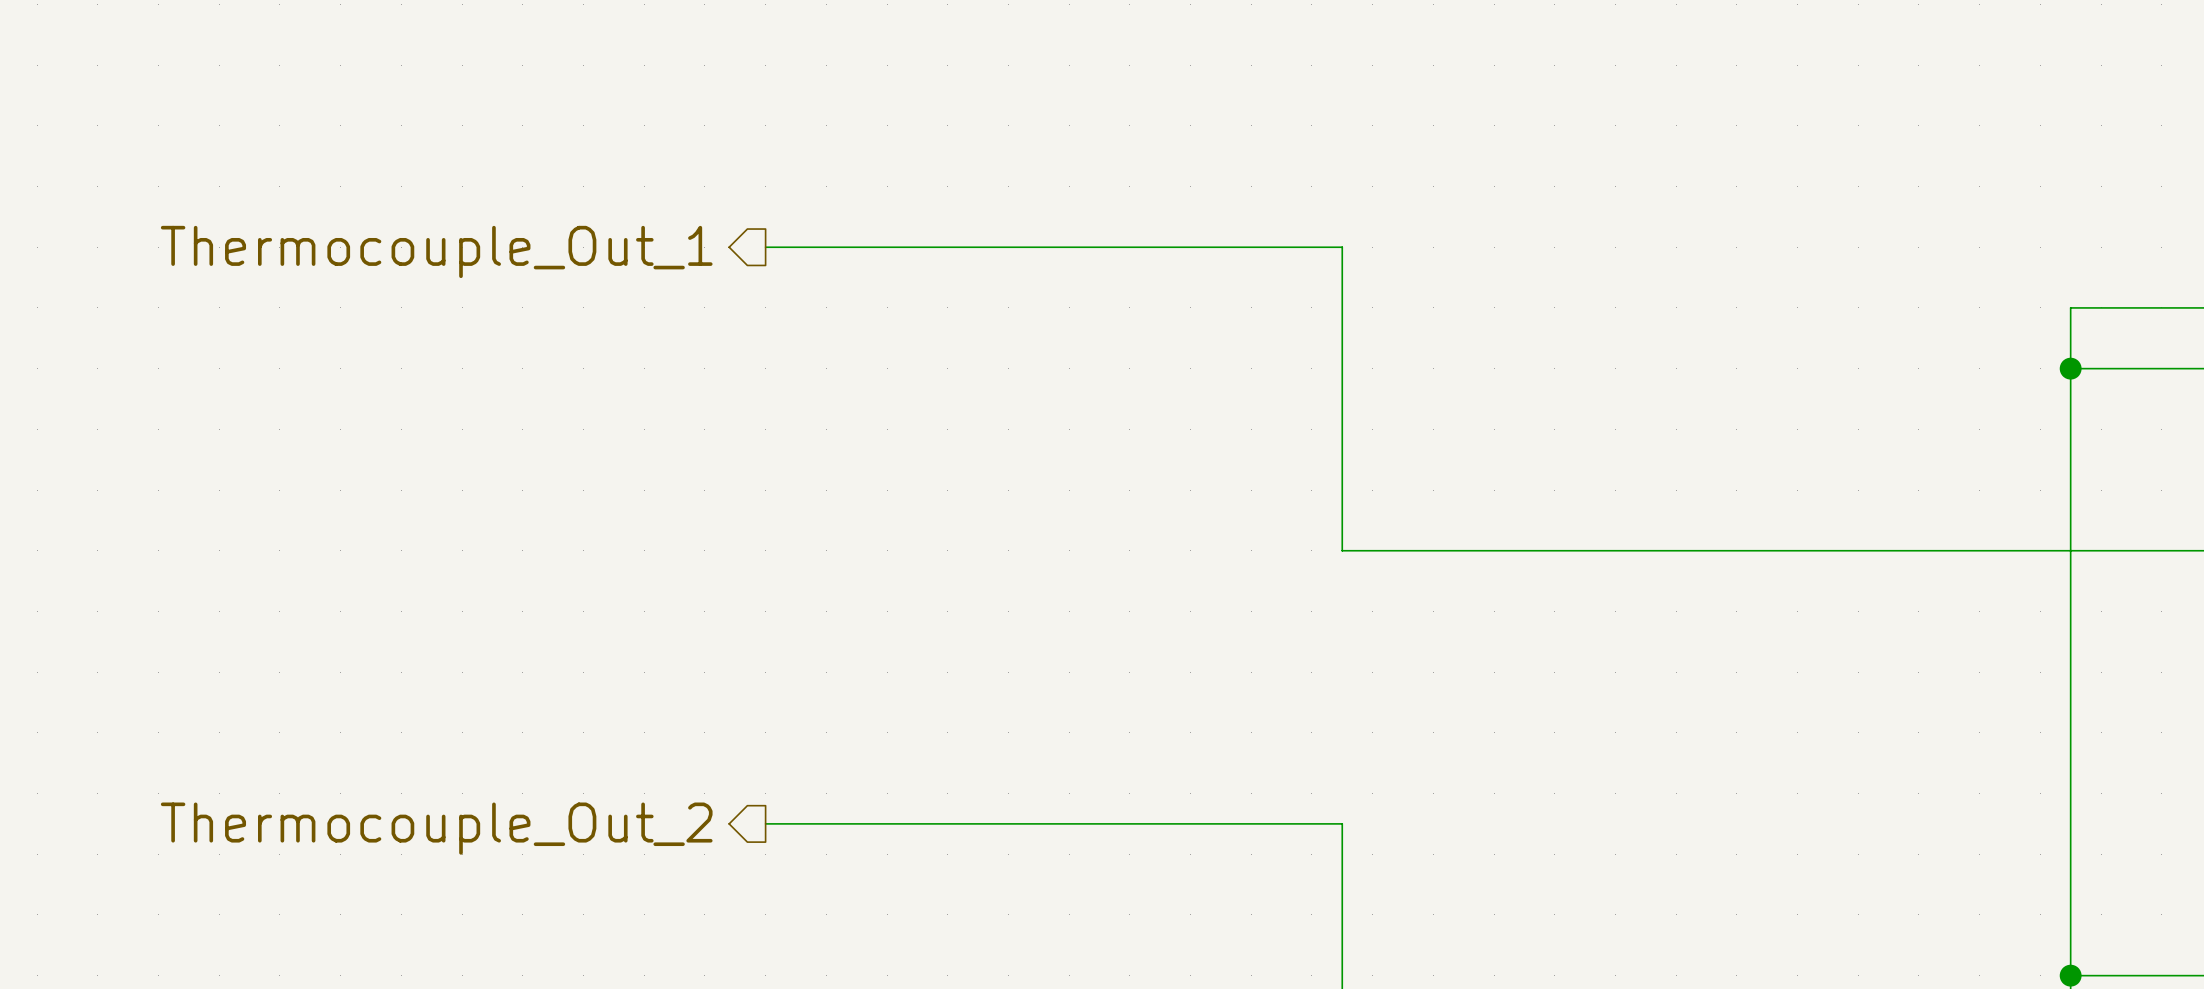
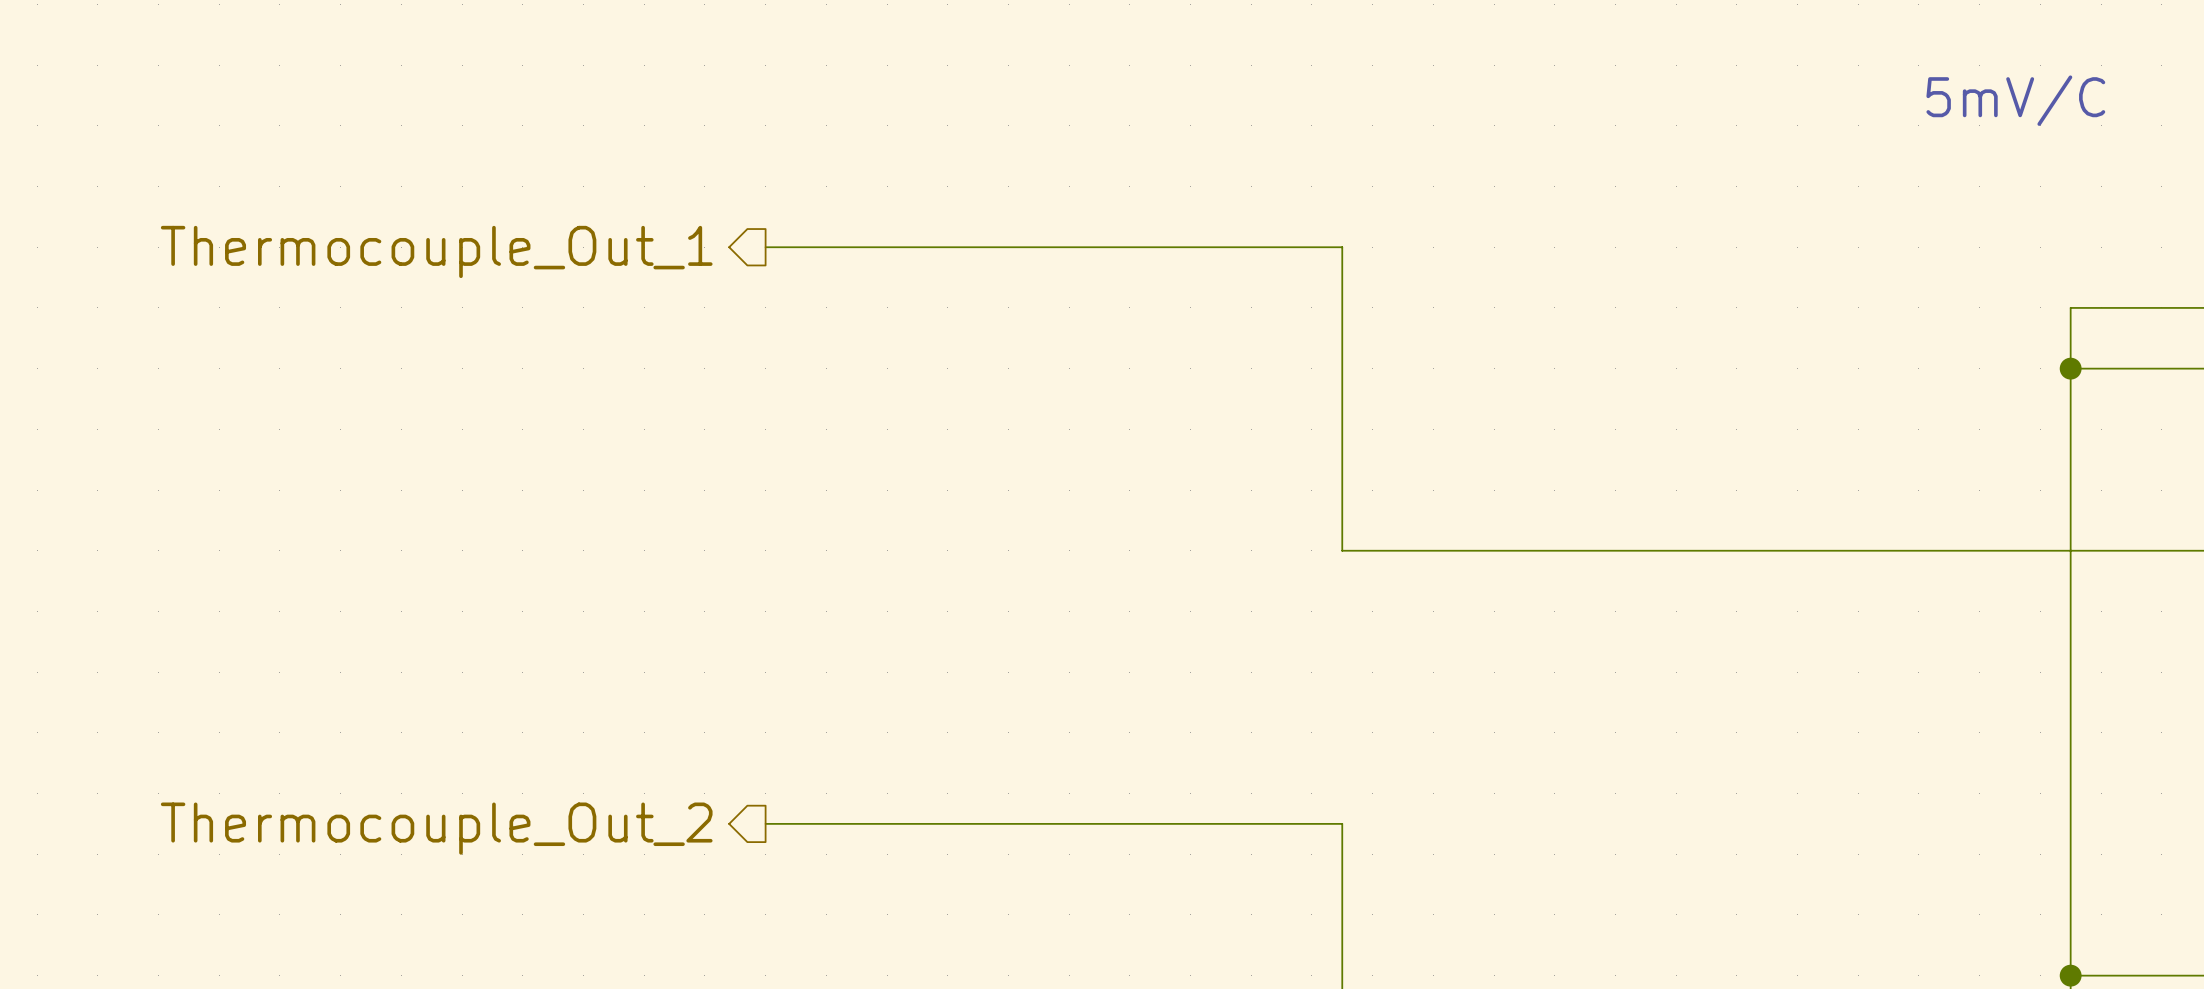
text: none -> 5mV/C (2015, 100)

